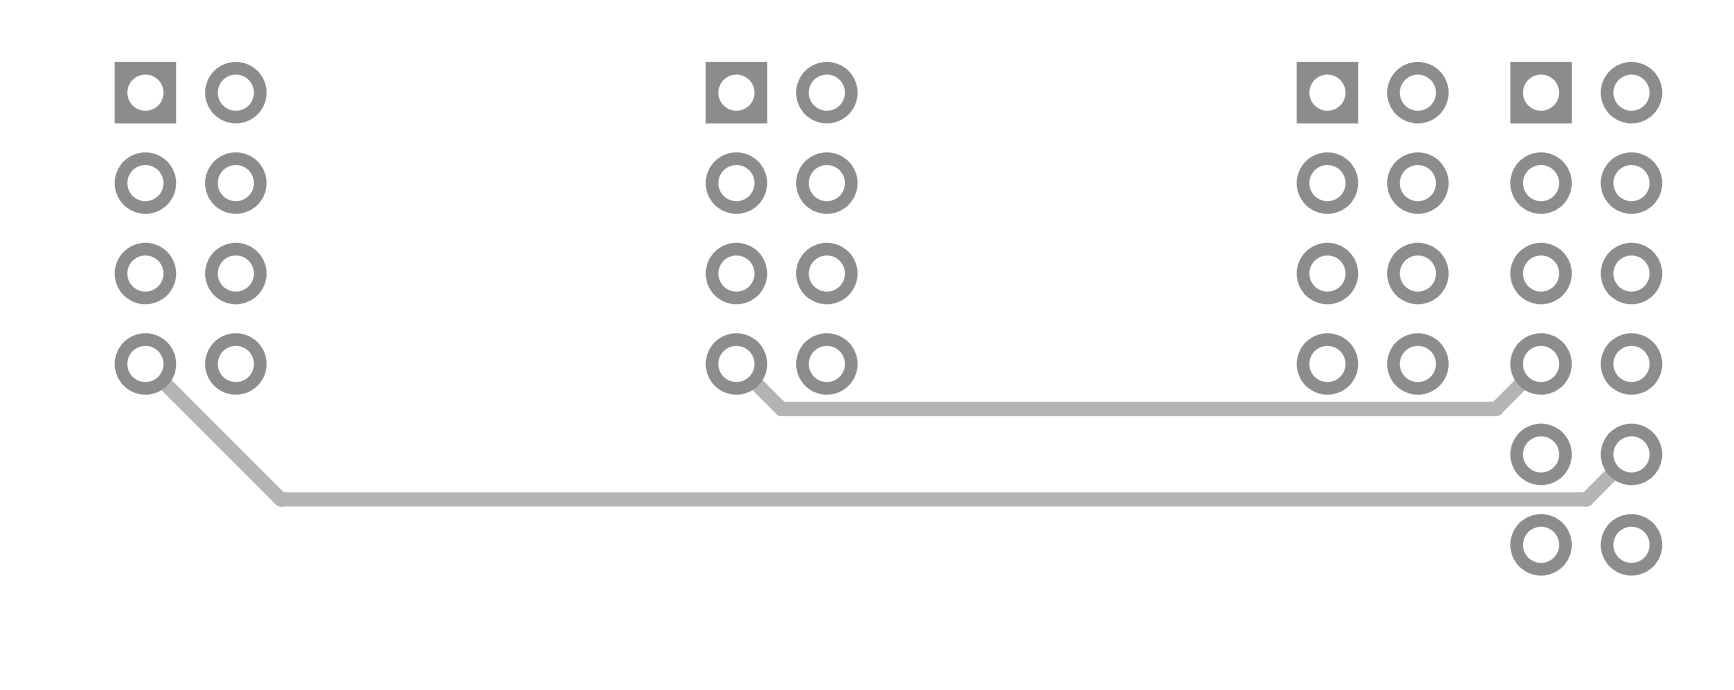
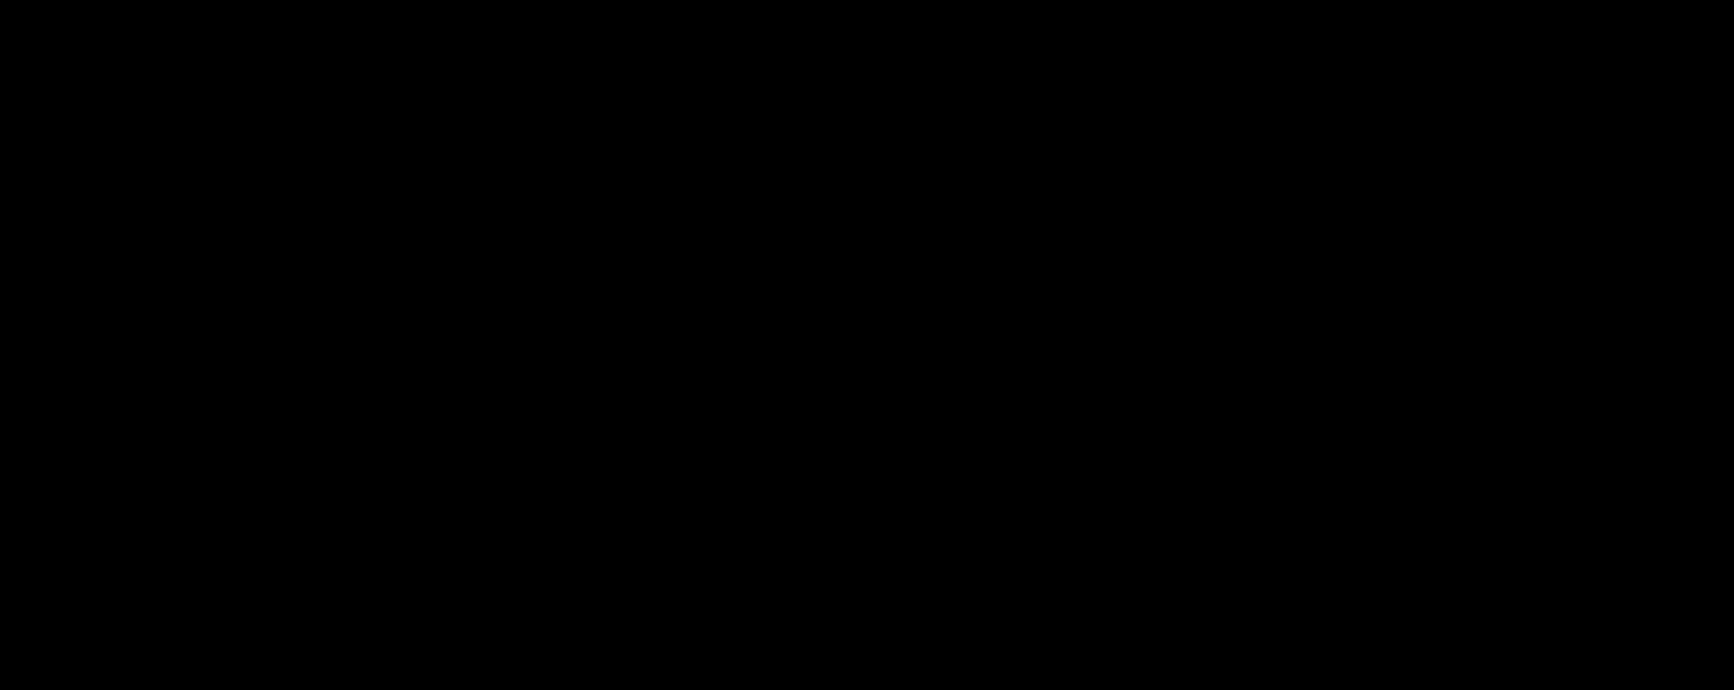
part: (190, 228) -> none
part: (781, 228) -> none
part: (1372, 228) -> none
part: (1586, 318) -> none
track: (145, 363) (280, 499) (1586, 499) (1631, 454) -> none
track: (1541, 363) (1496, 408) (781, 408) (736, 363) -> none

